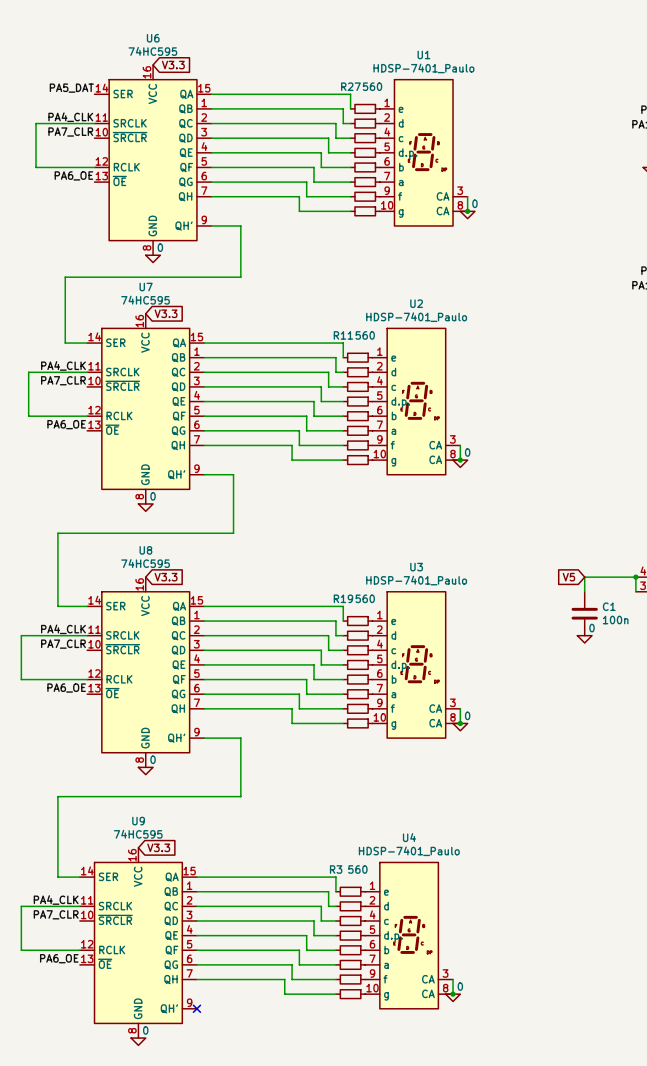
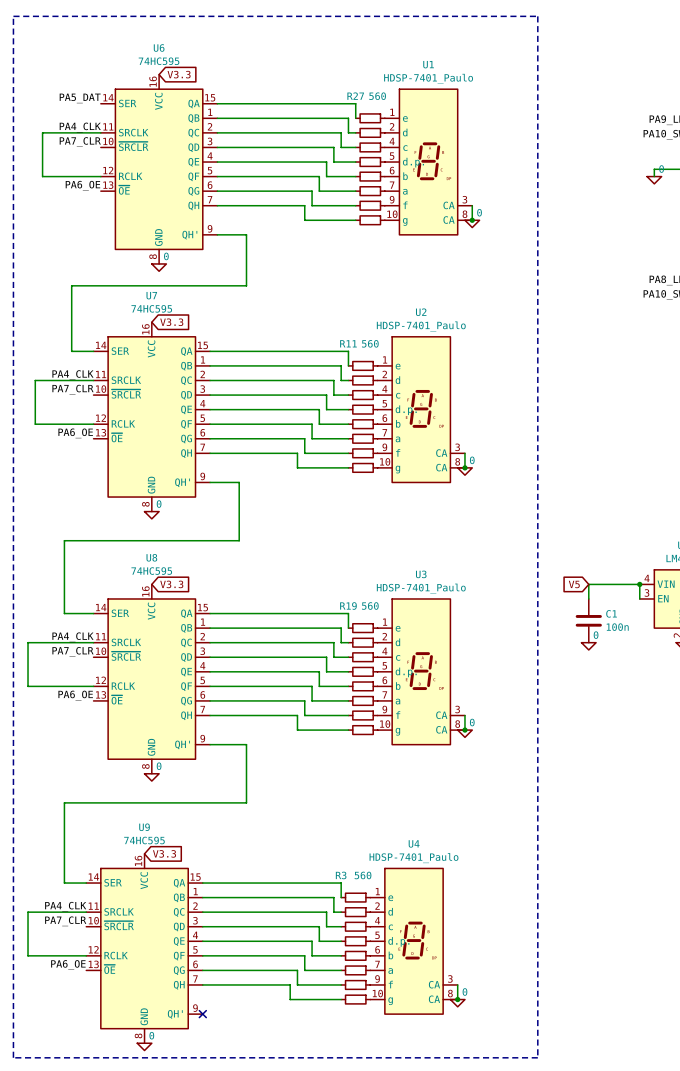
line: none -> (13, 16) (537, 16) (537, 1057) (13, 1057) (13, 16)

